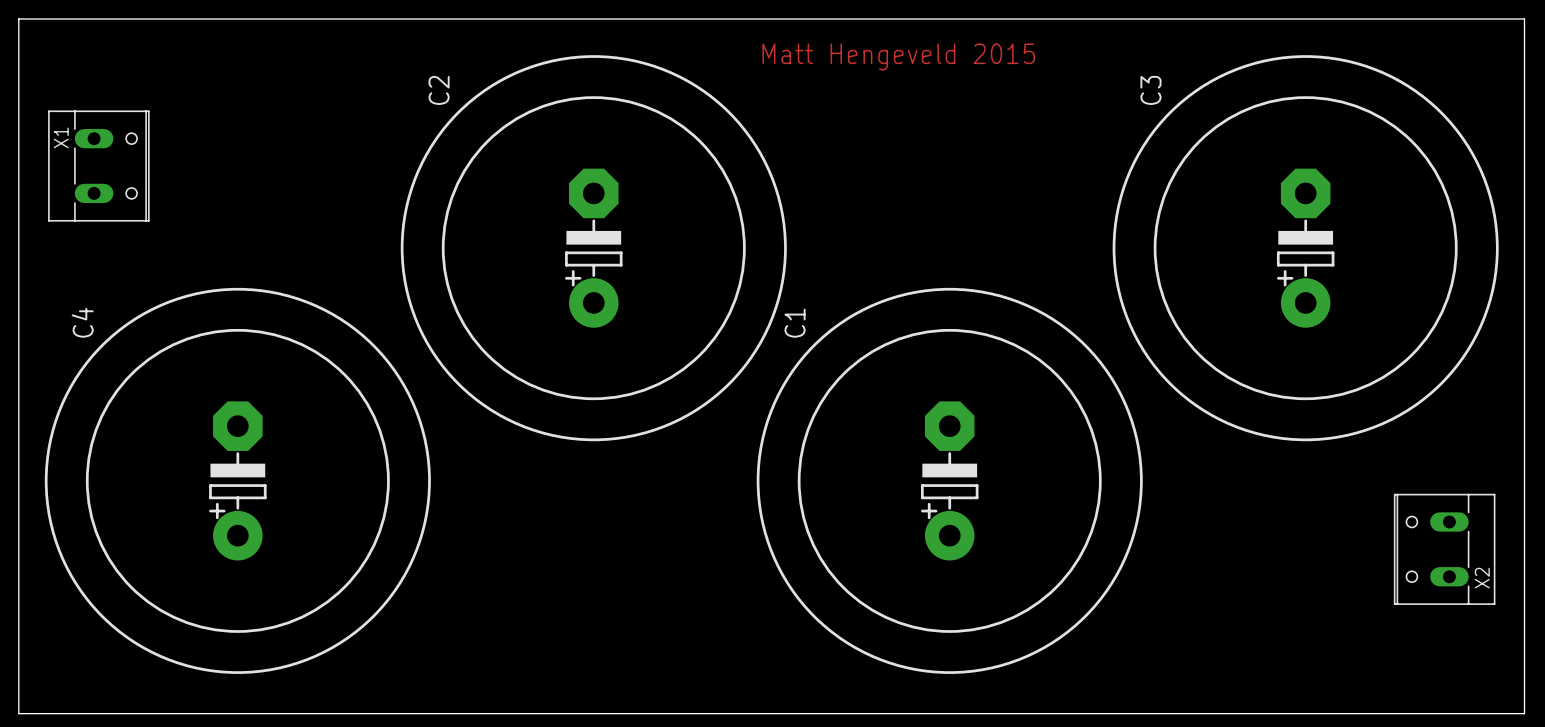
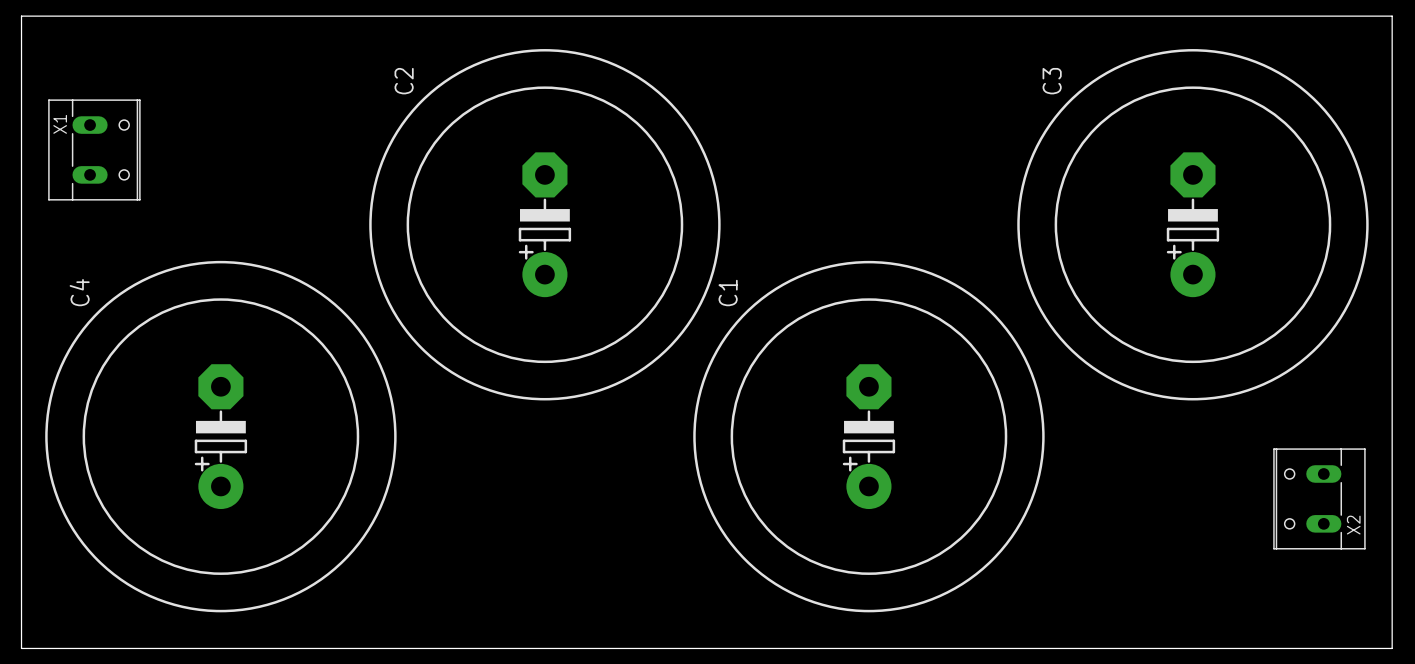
text: Matt Hengeveld 2015 (898, 56) -> none

